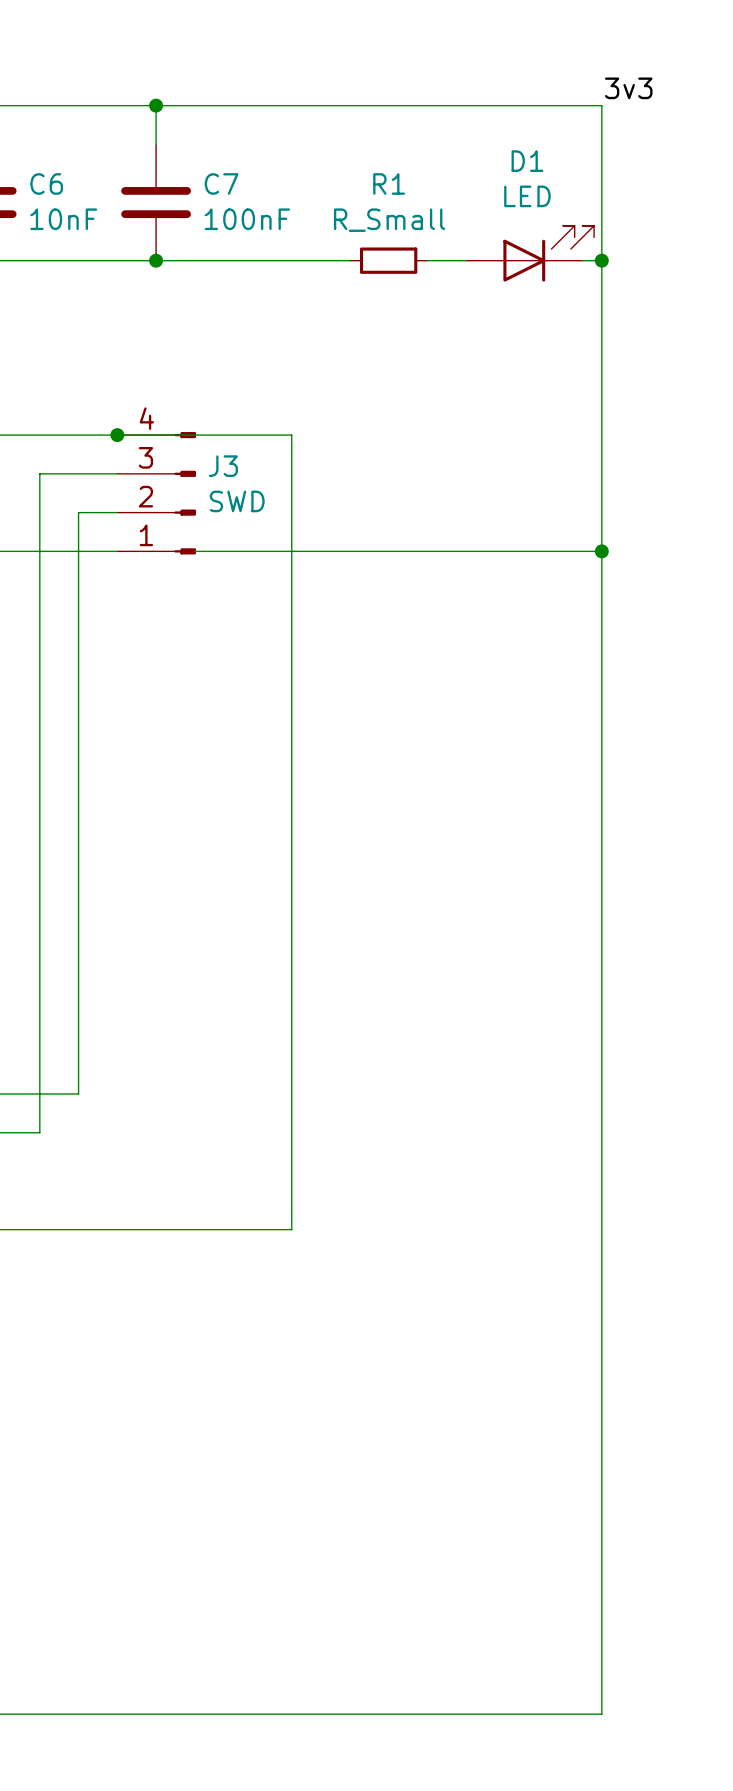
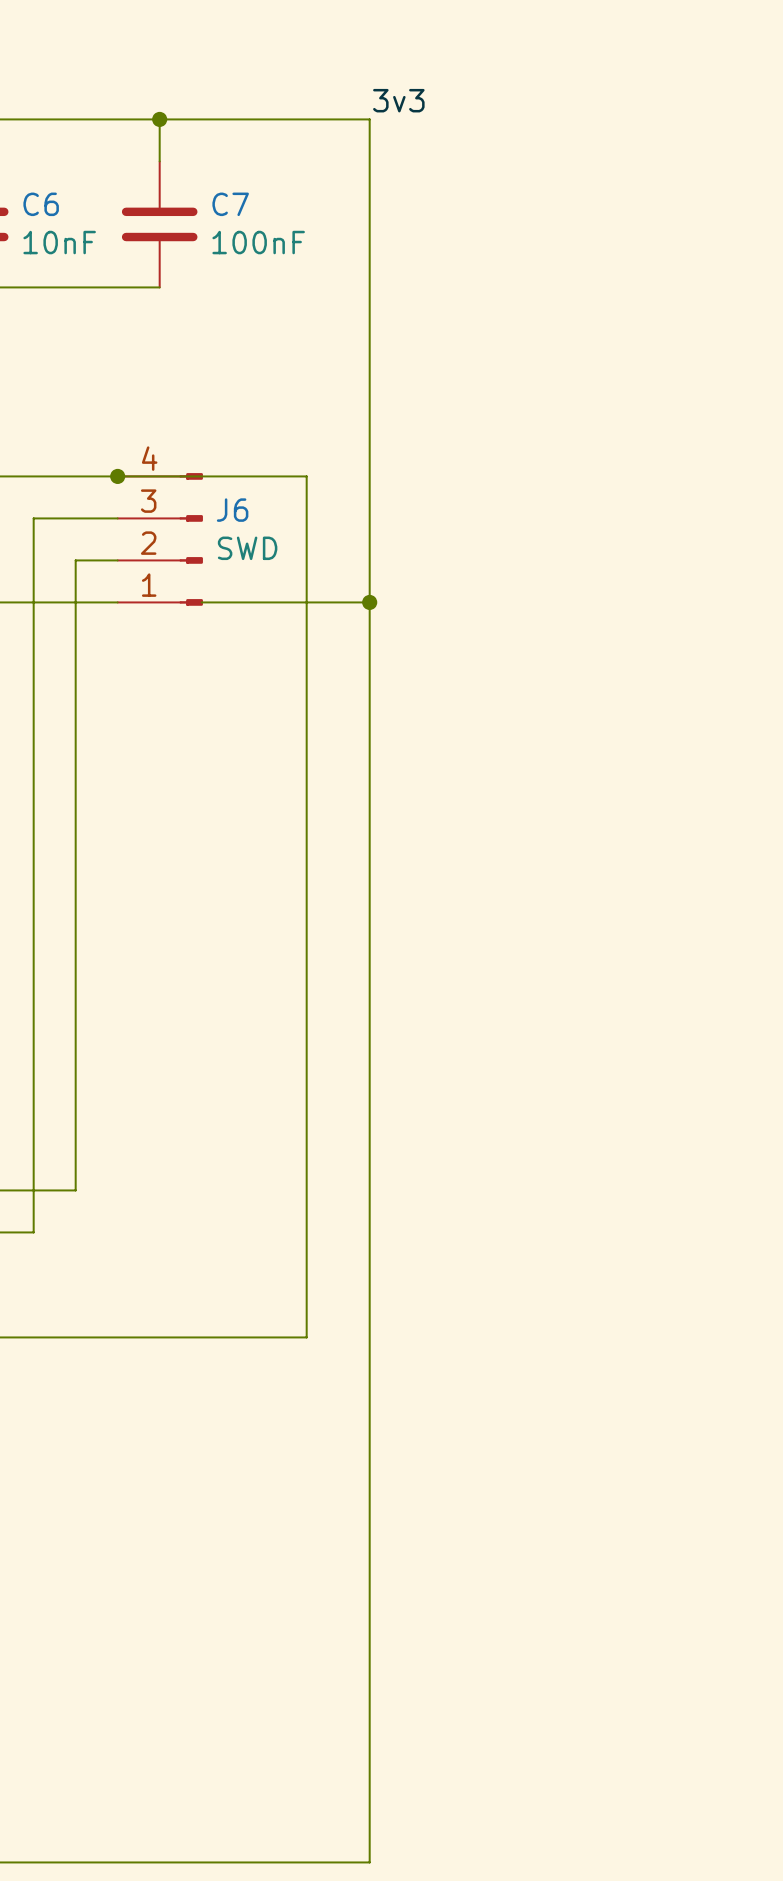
label position: 3v3 (628, 88) -> 3v3 (398, 100)
wire: (349, 105) (601, 105) (601, 1714) (349, 1714) -> (369, 119) (369, 1862)
D1: LED (530, 253) -> none
wire: (156, 260) (349, 260) -> none
junction: (156, 260) -> none
R1: R_Small (388, 260) -> none
wire: (427, 260) (466, 260) -> none
wire: (582, 260) (601, 260) -> none
junction: (601, 260) -> none
J3 name: J3 (223, 466) -> J6 (232, 510)
wire: (349, 551) (601, 551) -> none
junction: none -> (369, 602)
junction: (601, 551) -> none

